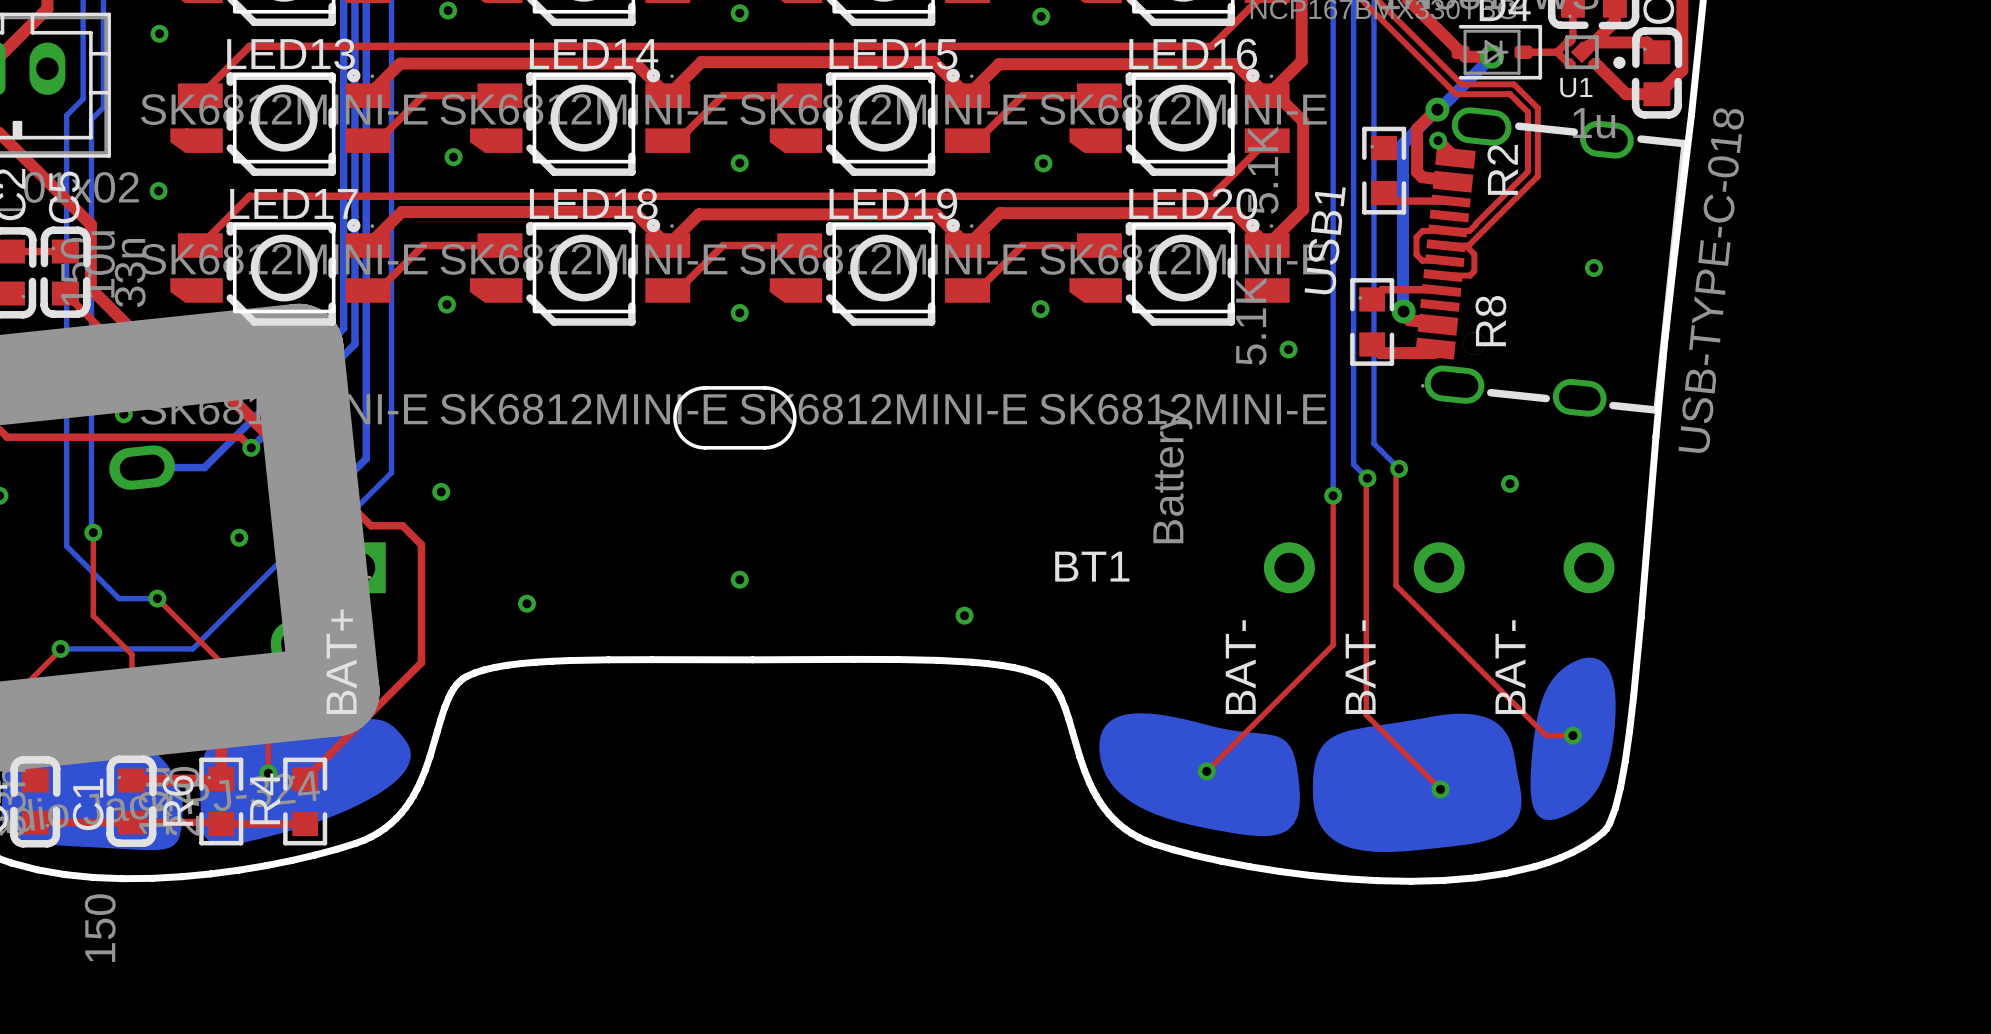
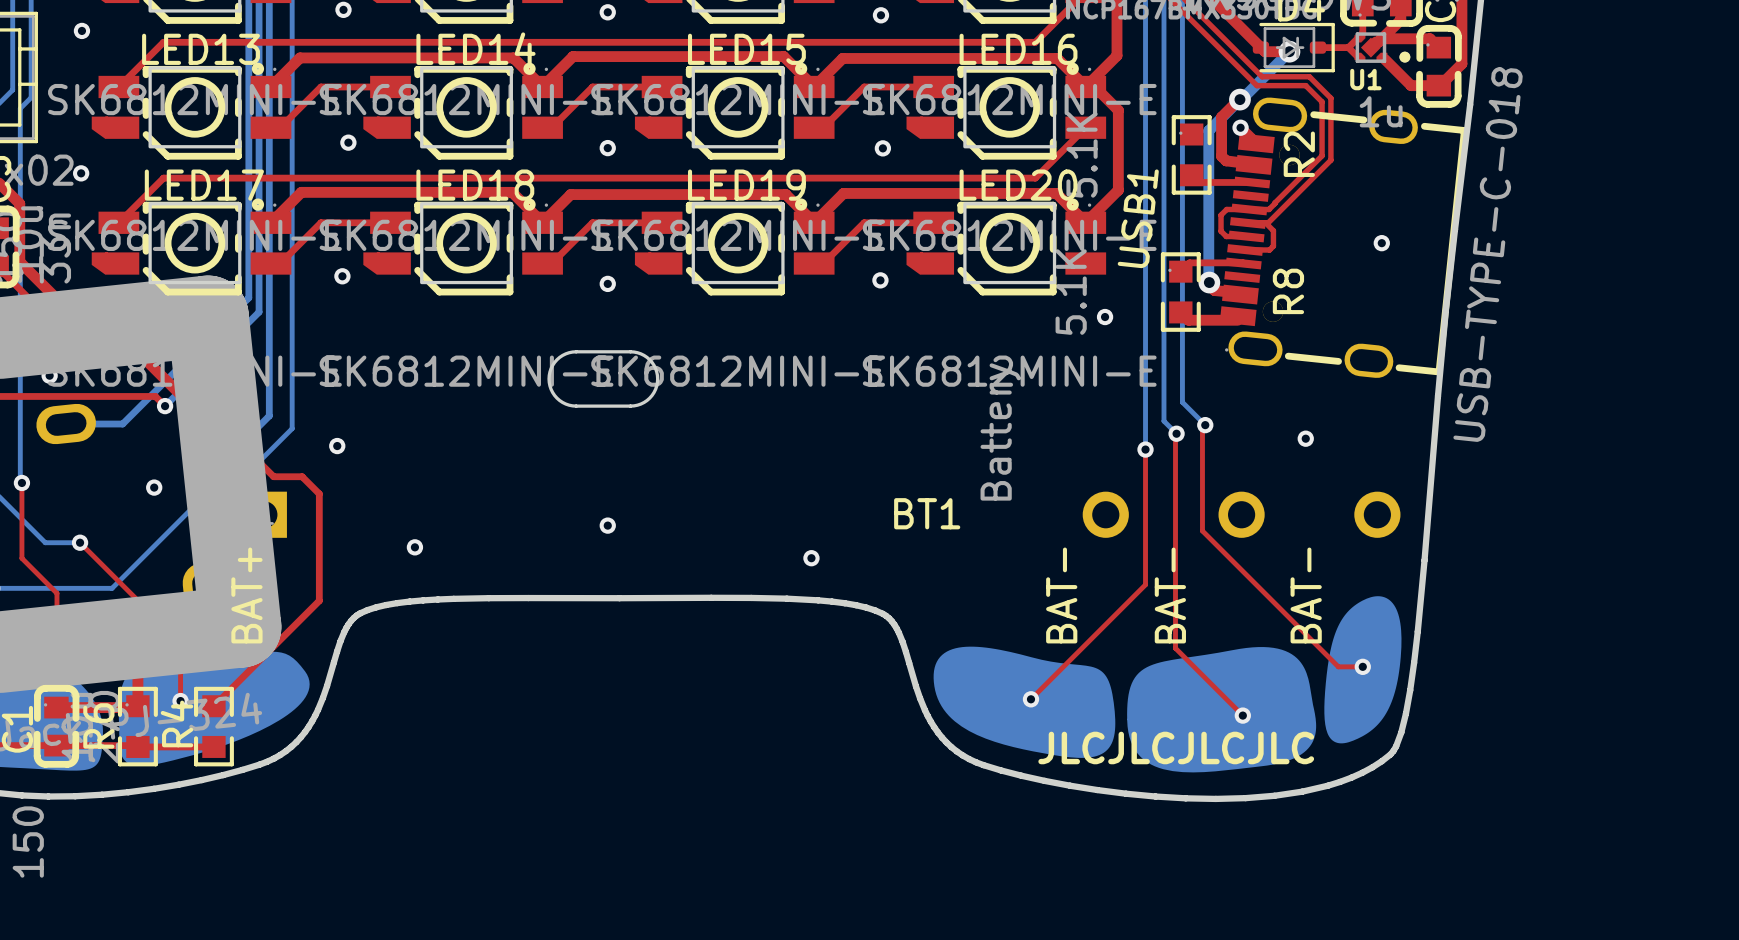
text: none -> JLCJLCJLCJLC (1176, 747)

